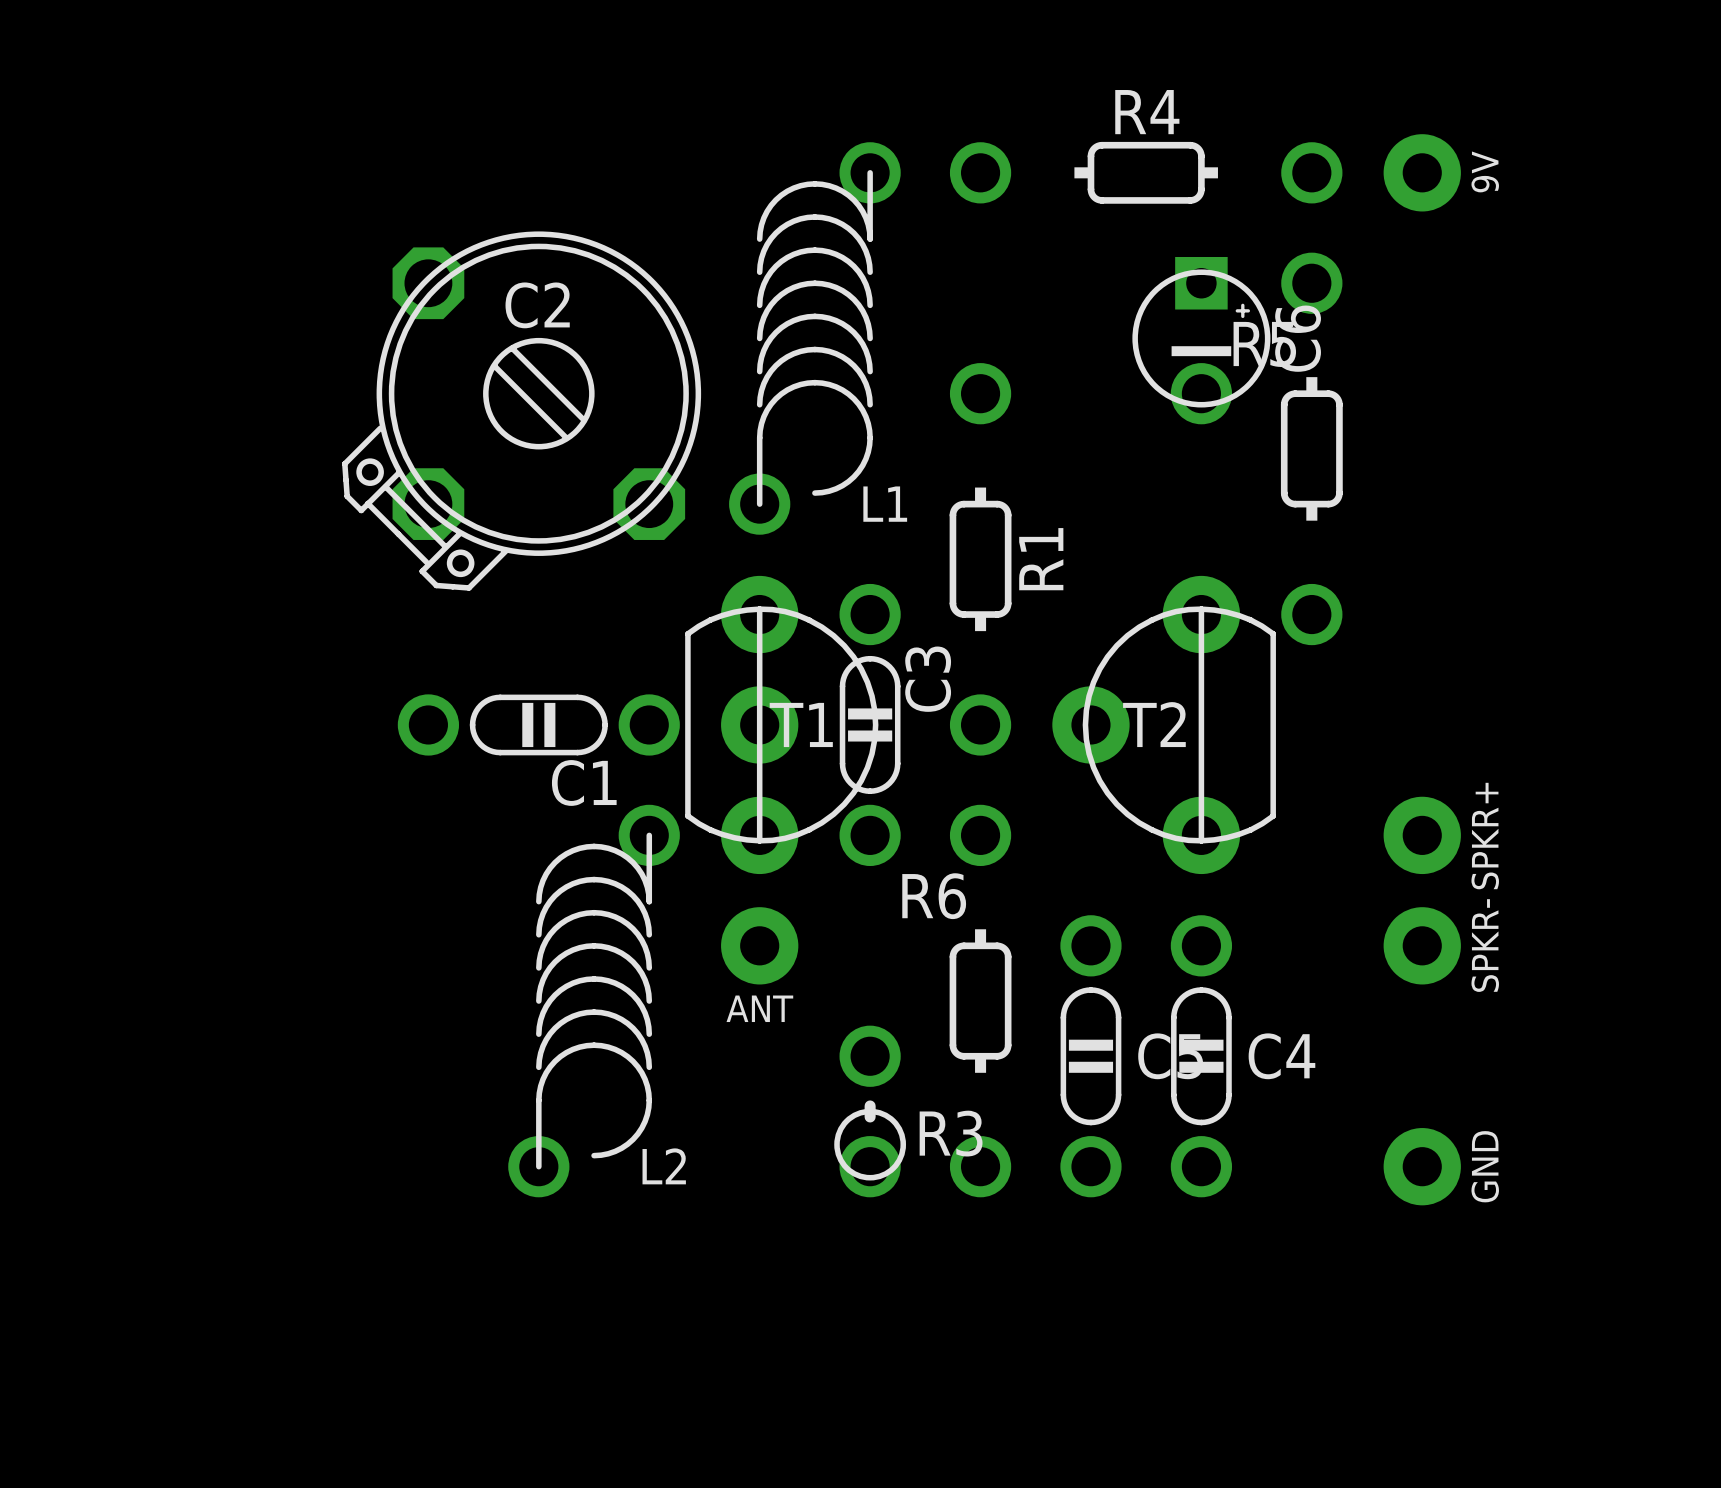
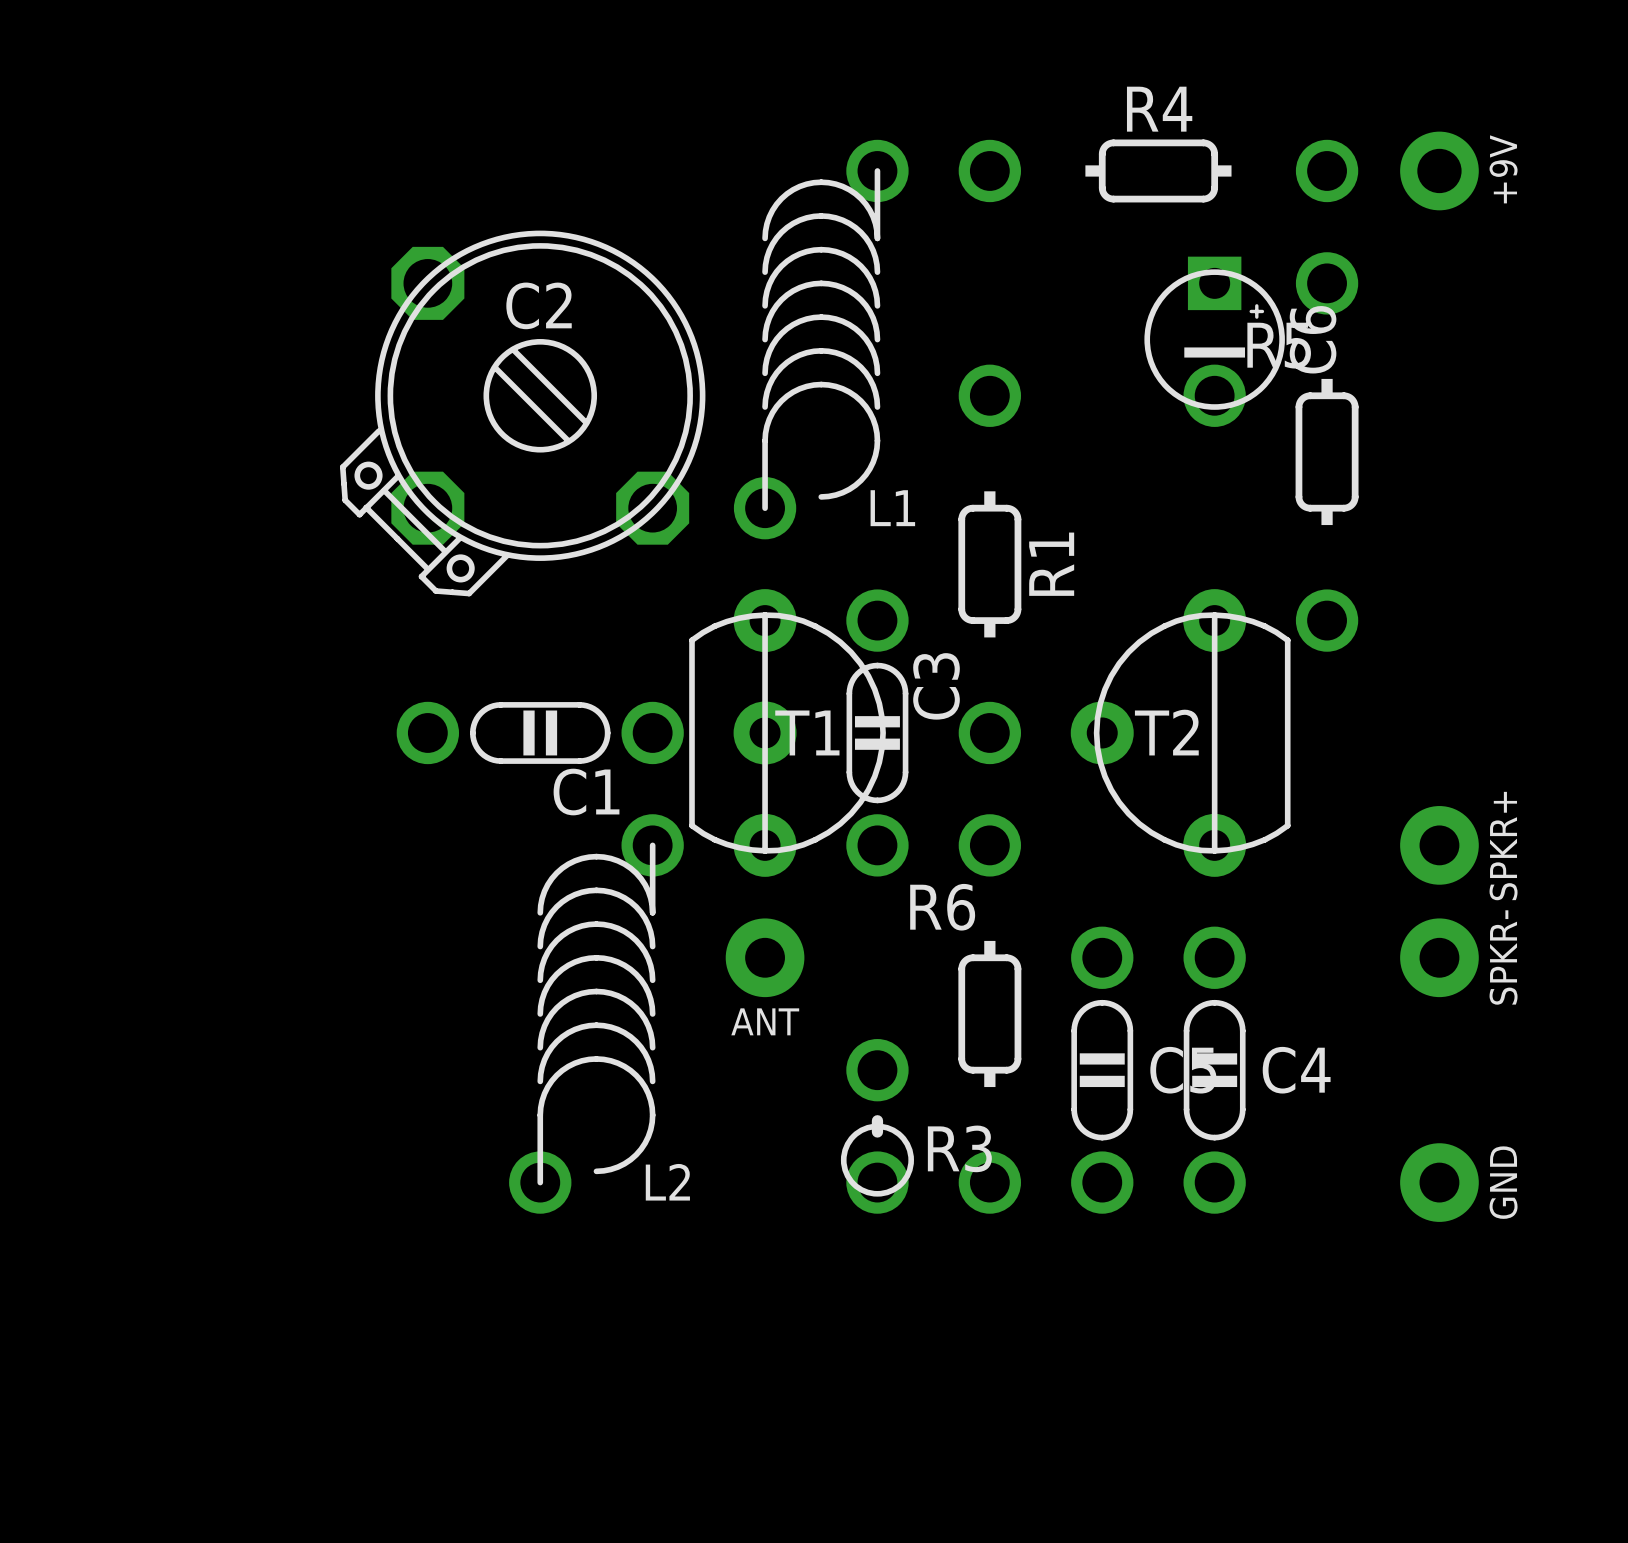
9V: (1422, 172) -> none
+9V: none -> (1439, 170)
T1 footprint: [685, 575, 879, 875] -> [689, 589, 886, 877]
T2 footprint: [1052, 575, 1276, 875] -> [1070, 589, 1291, 877]

